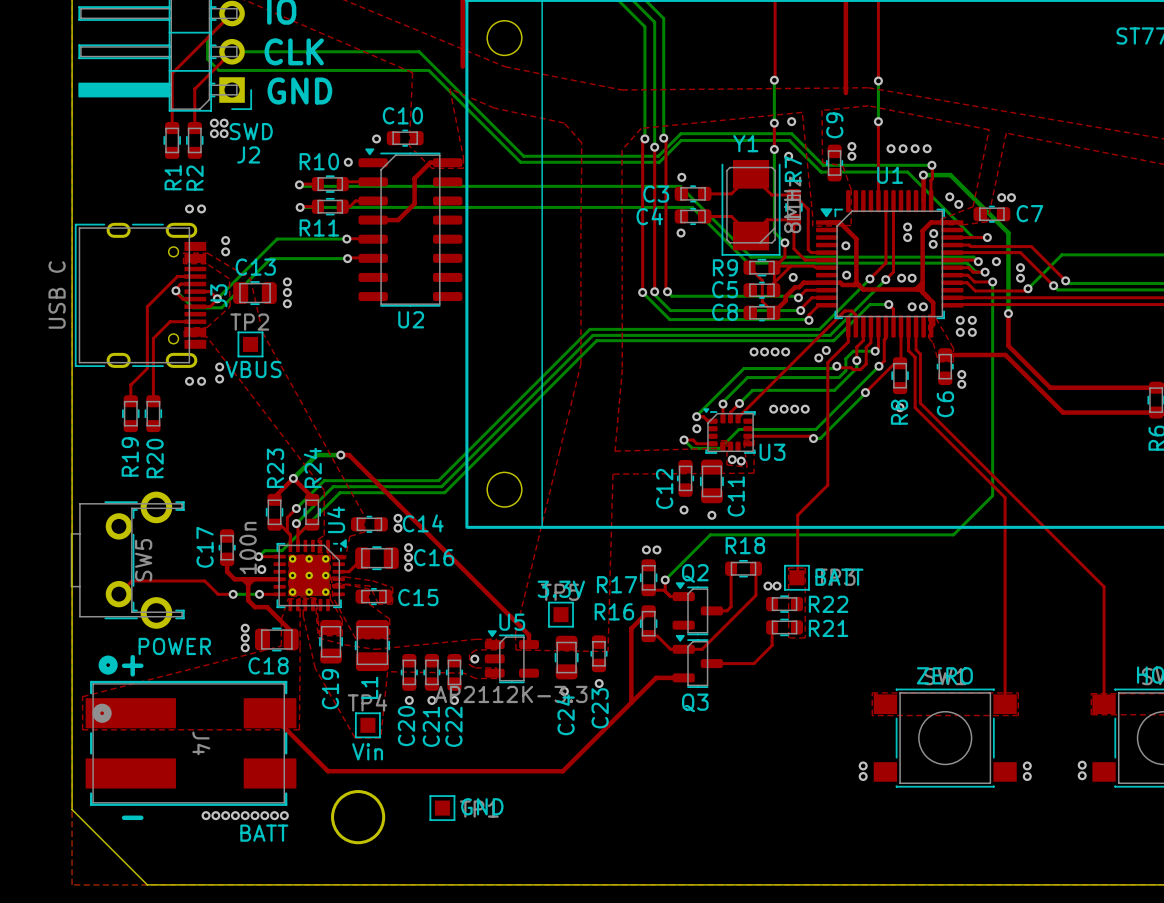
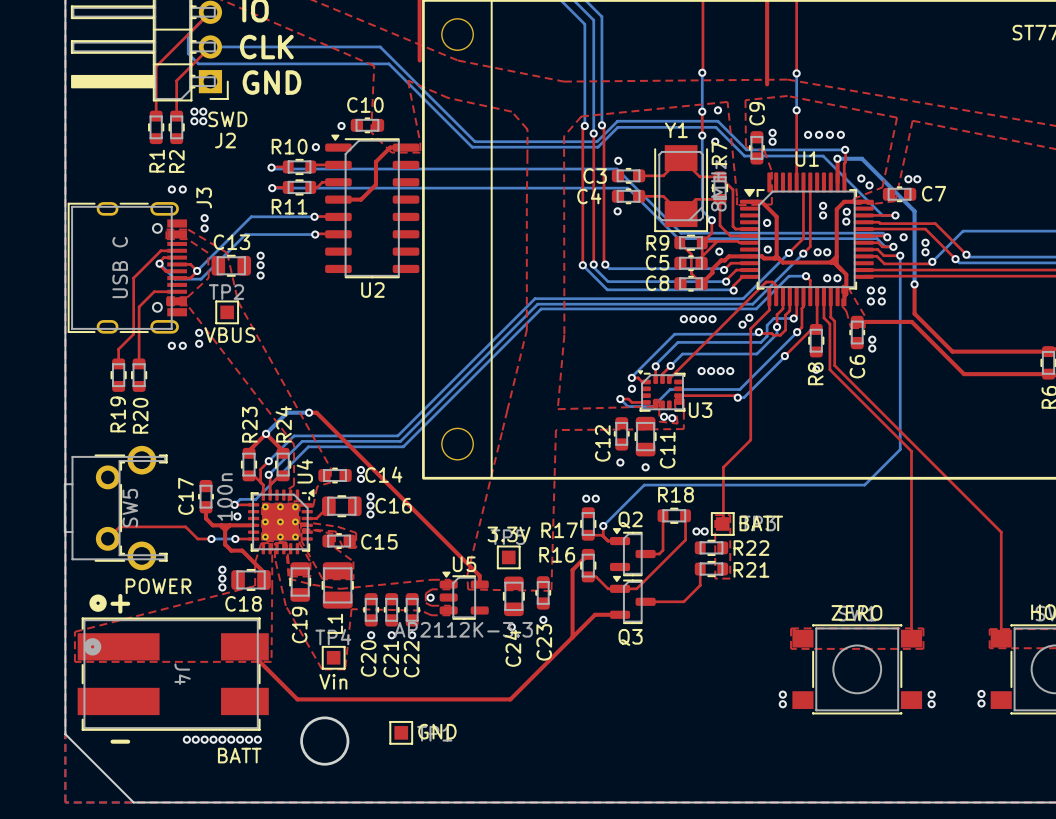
J3 value position: USB C (57, 295) -> USB C (120, 267)
J3 name position: J3 (218, 295) -> J3 (204, 198)

